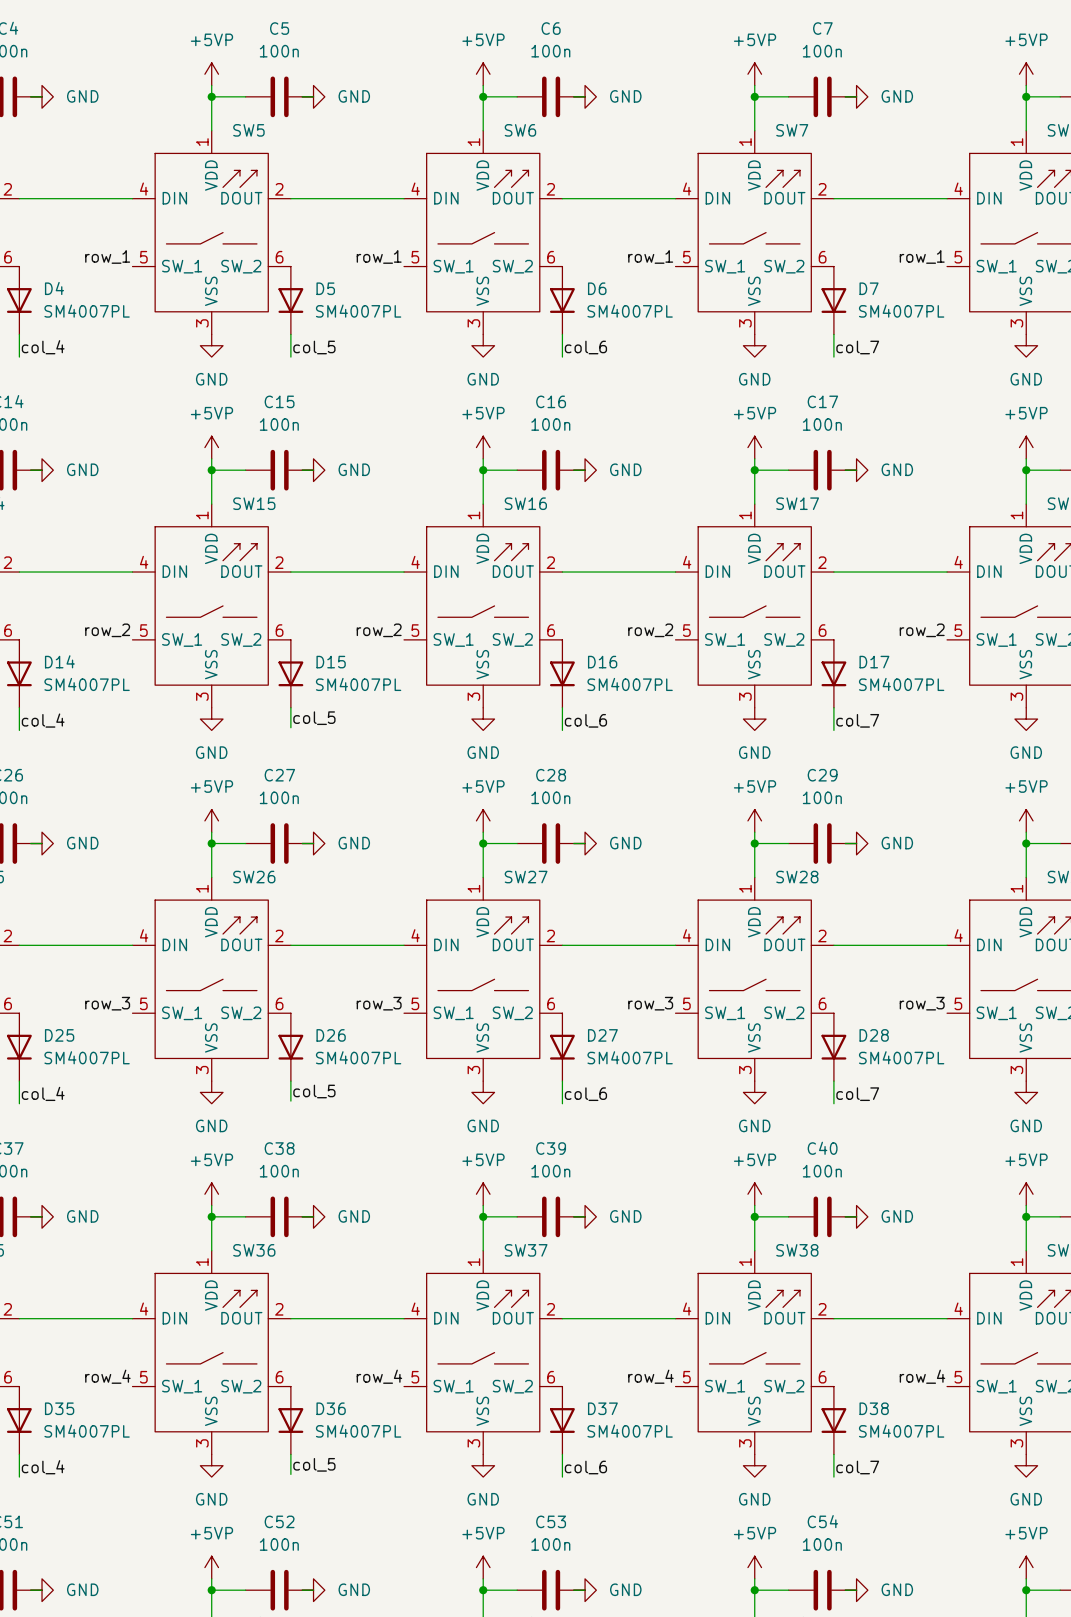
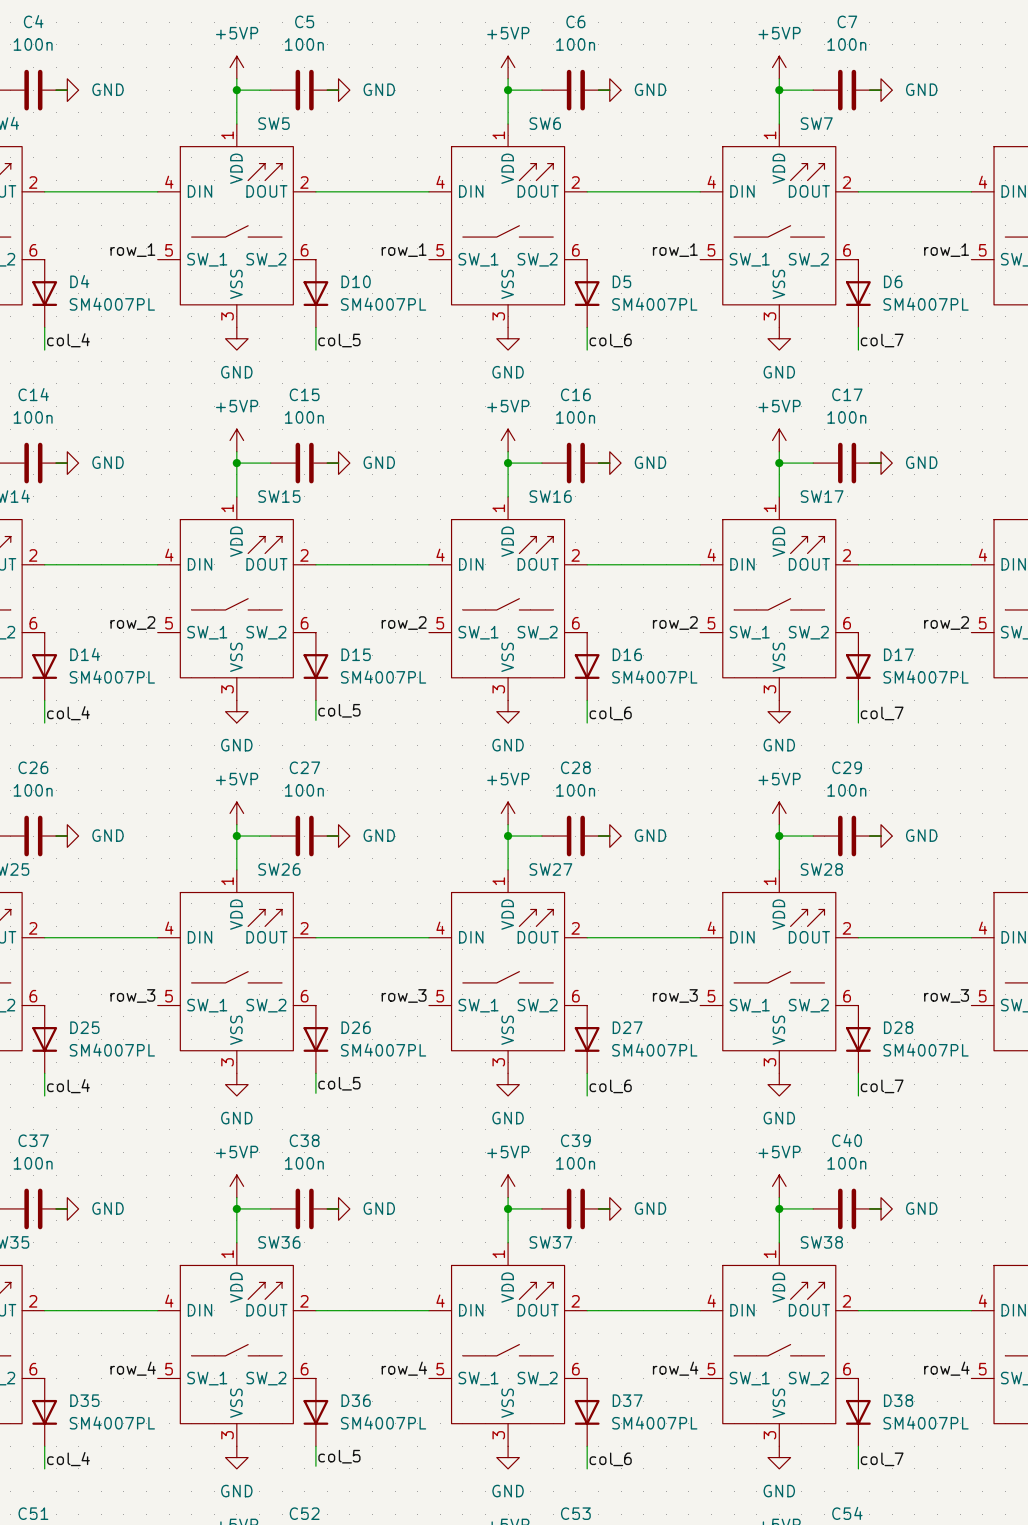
D5 name: D5 (325, 288) -> D10 (356, 281)
D6 name: D6 (597, 288) -> D5 (621, 281)
D7 name: D7 (869, 288) -> D6 (893, 281)

